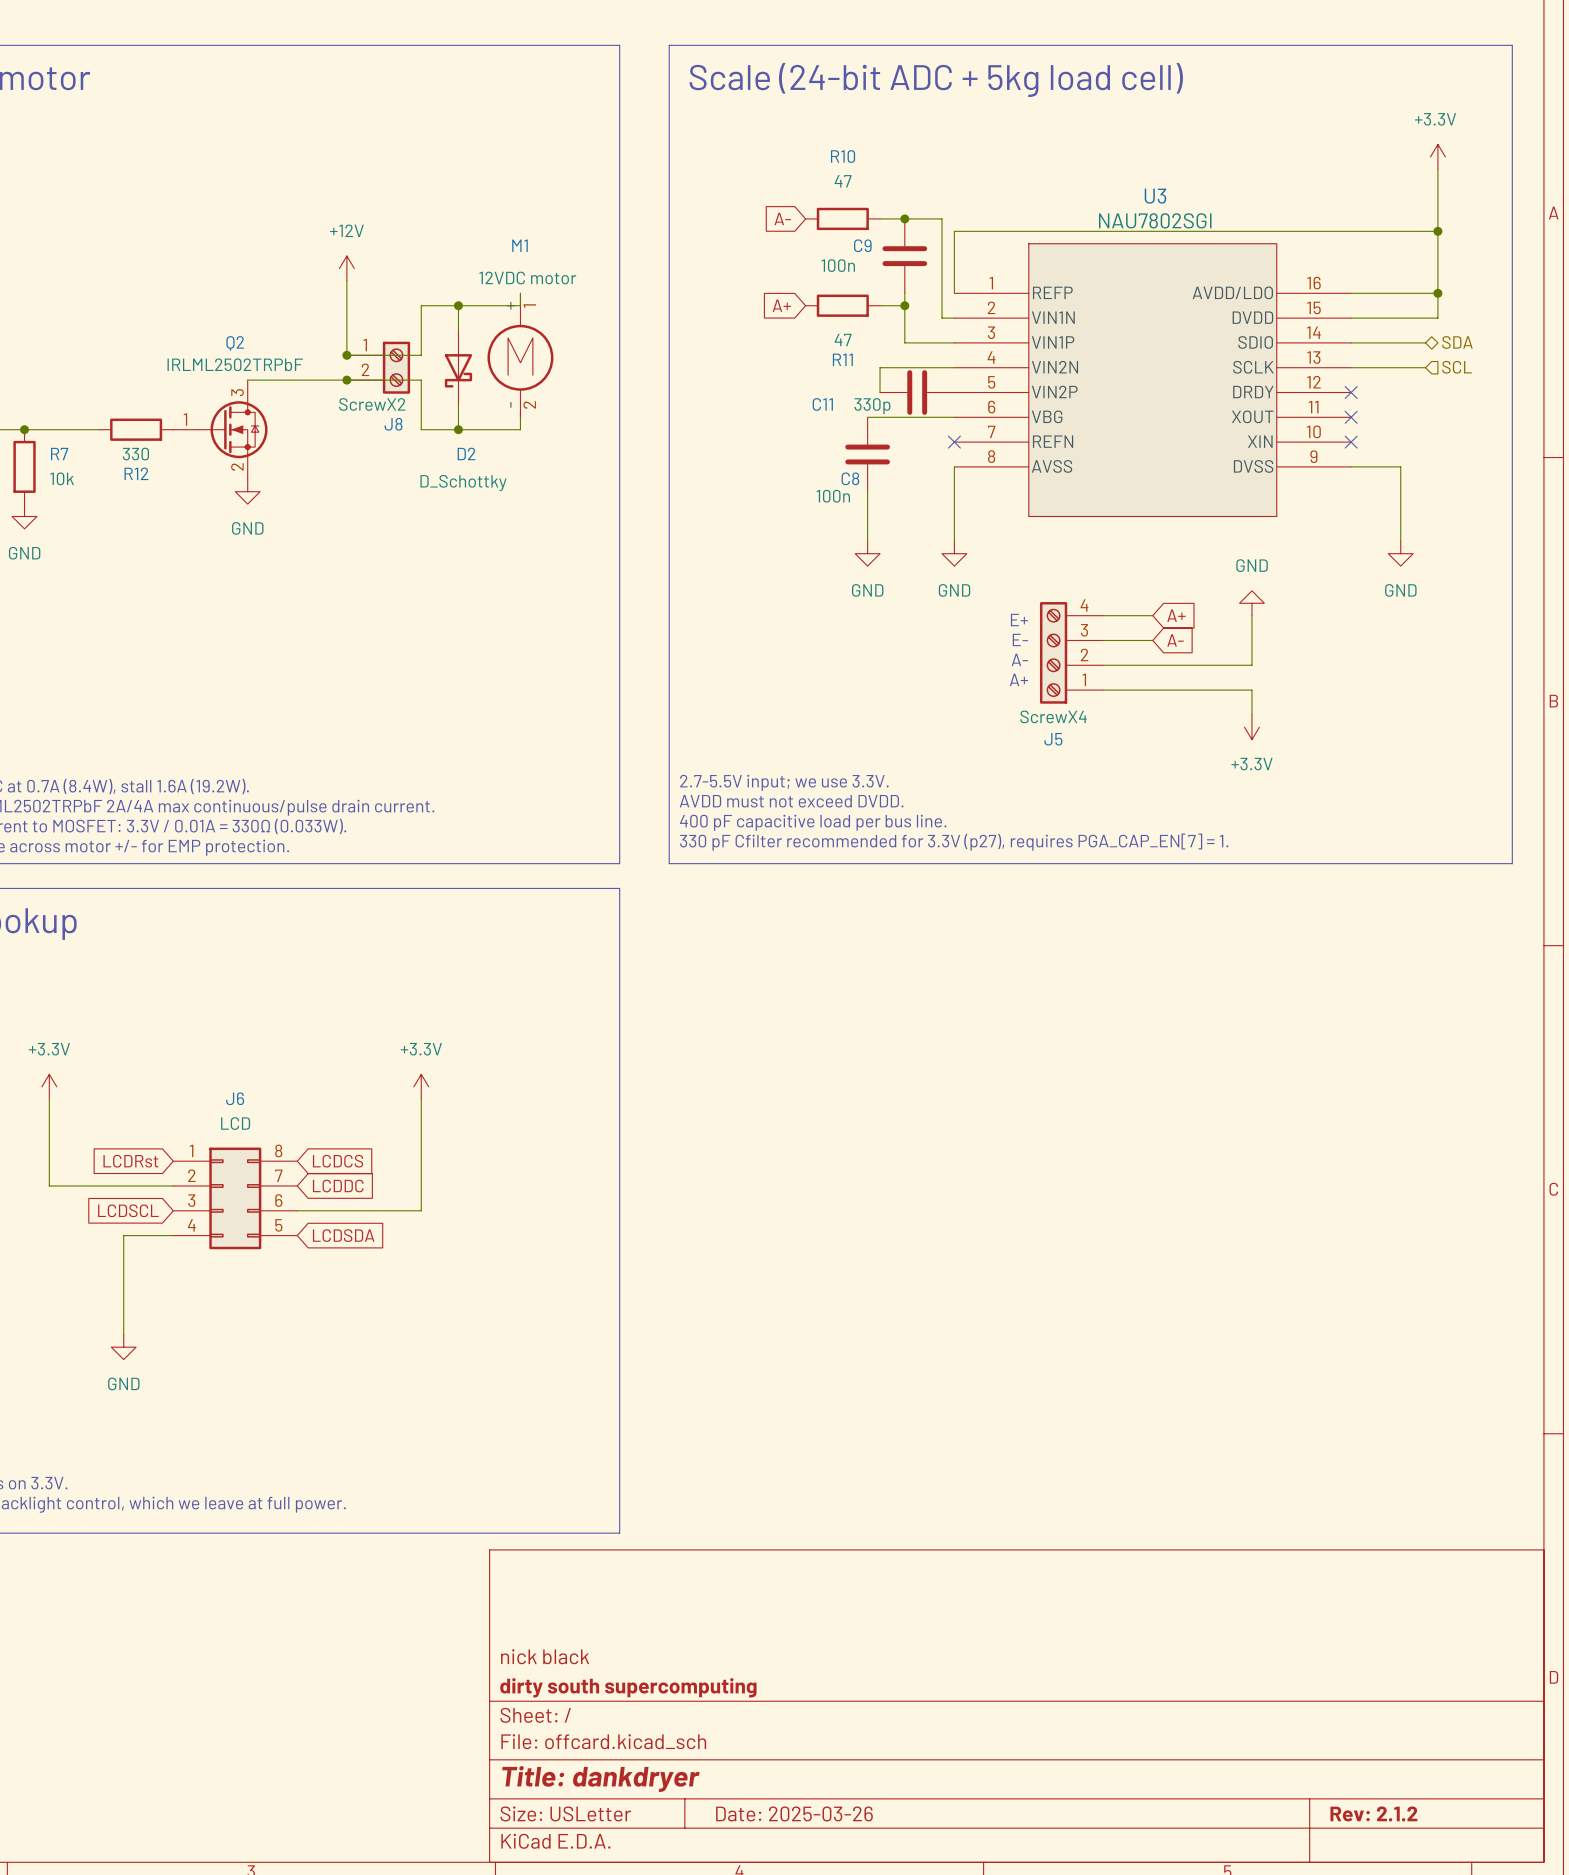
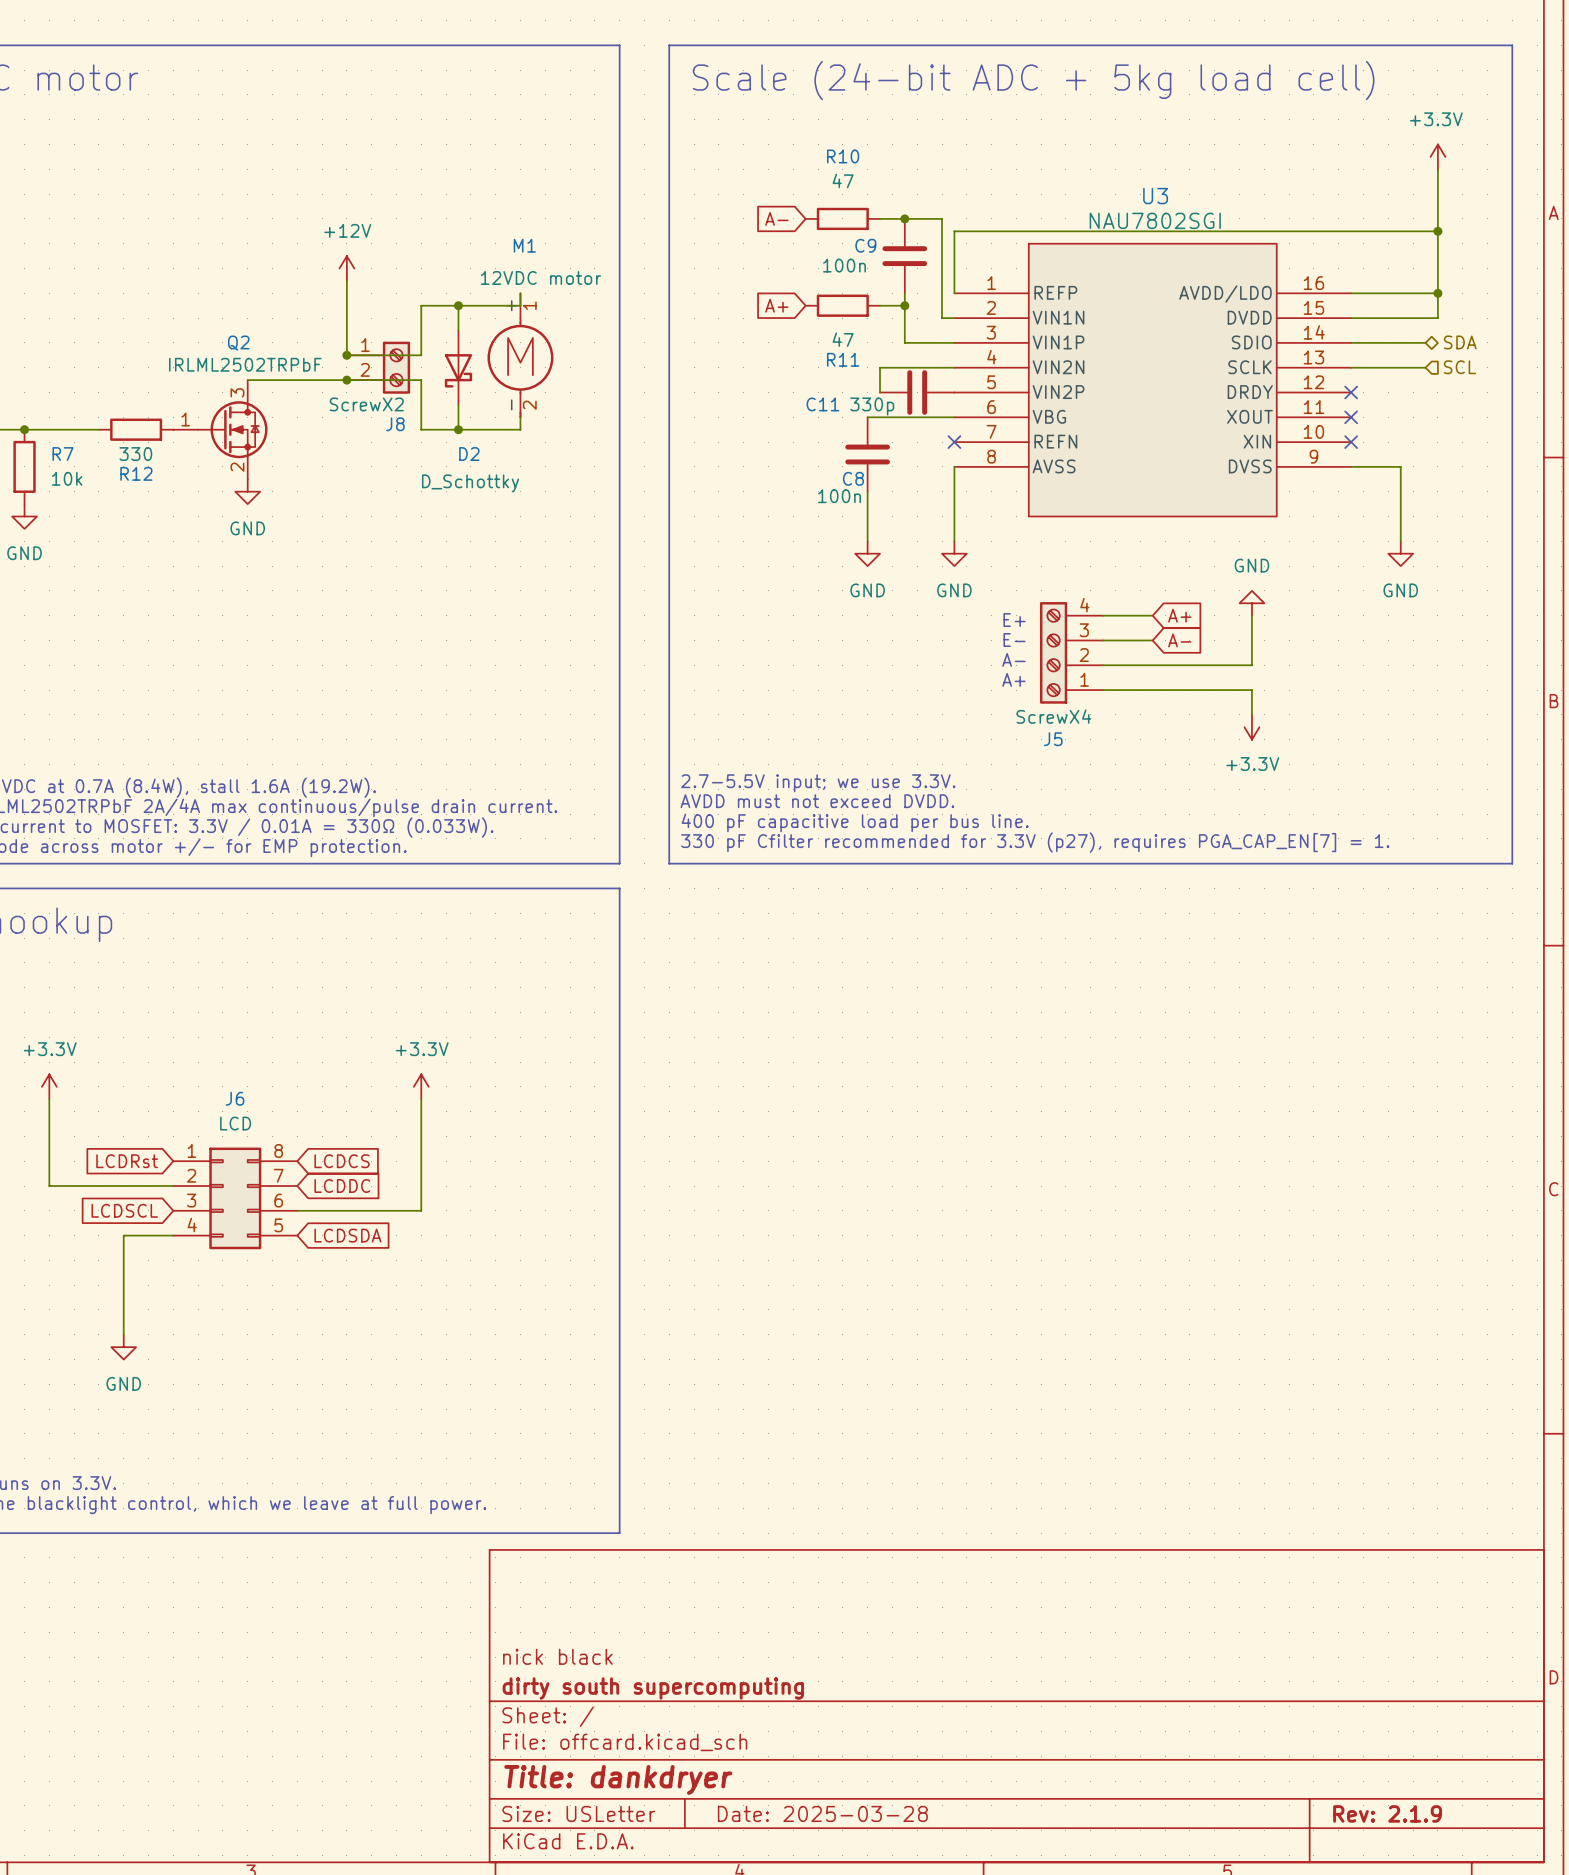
title block: Date: 2025-03-26 (794, 1813) -> Date: 2025-03-28 (822, 1813)
title block: Rev: 2.1.2 (1373, 1813) -> Rev: 2.1.9 (1387, 1813)

